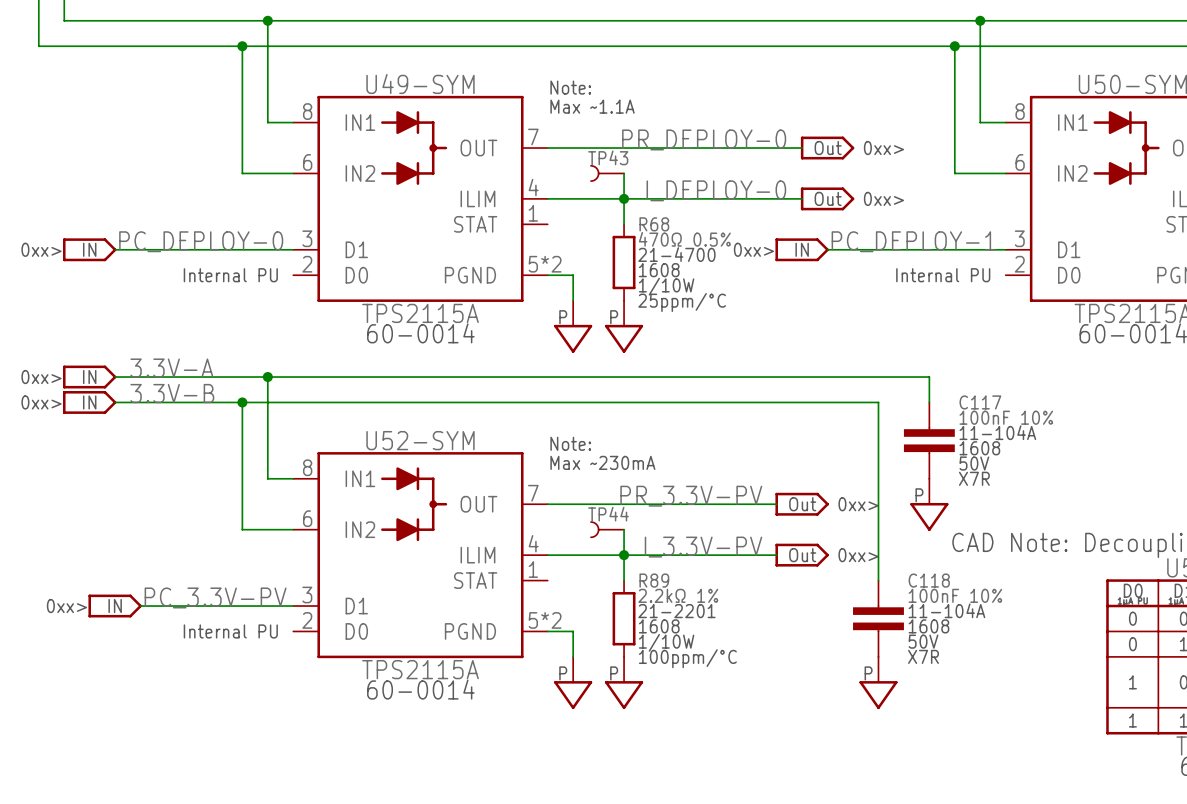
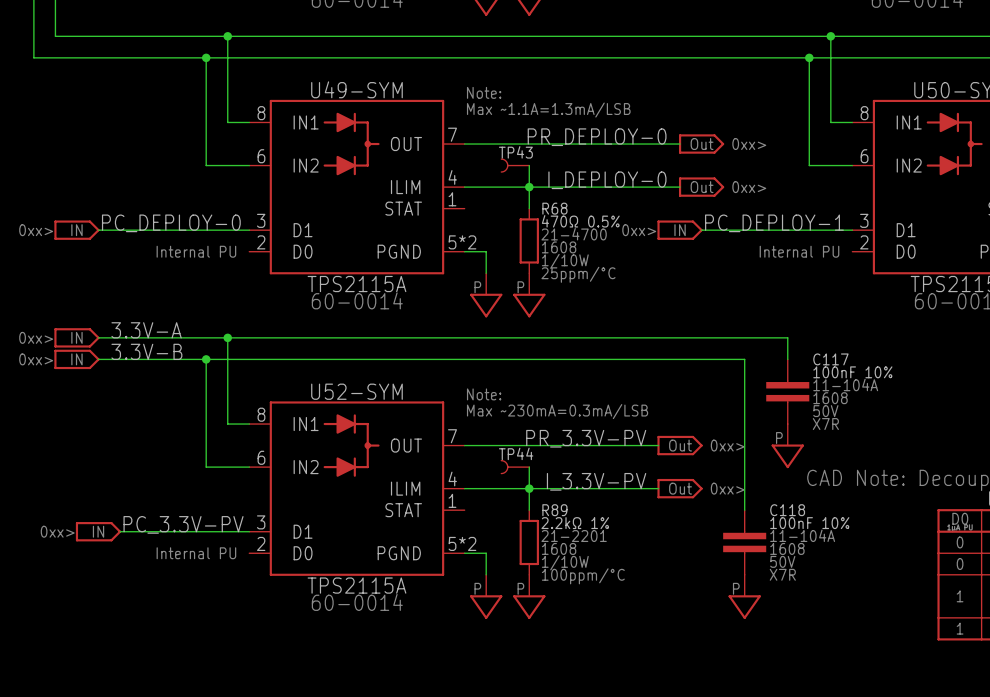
text: Max ~1.1A (592, 106) -> Max ~1.1A=1.3mA/LSB (548, 110)
text: Max ~230mA (602, 462) -> Max ~230mA=0.3mA/LSB (557, 411)

